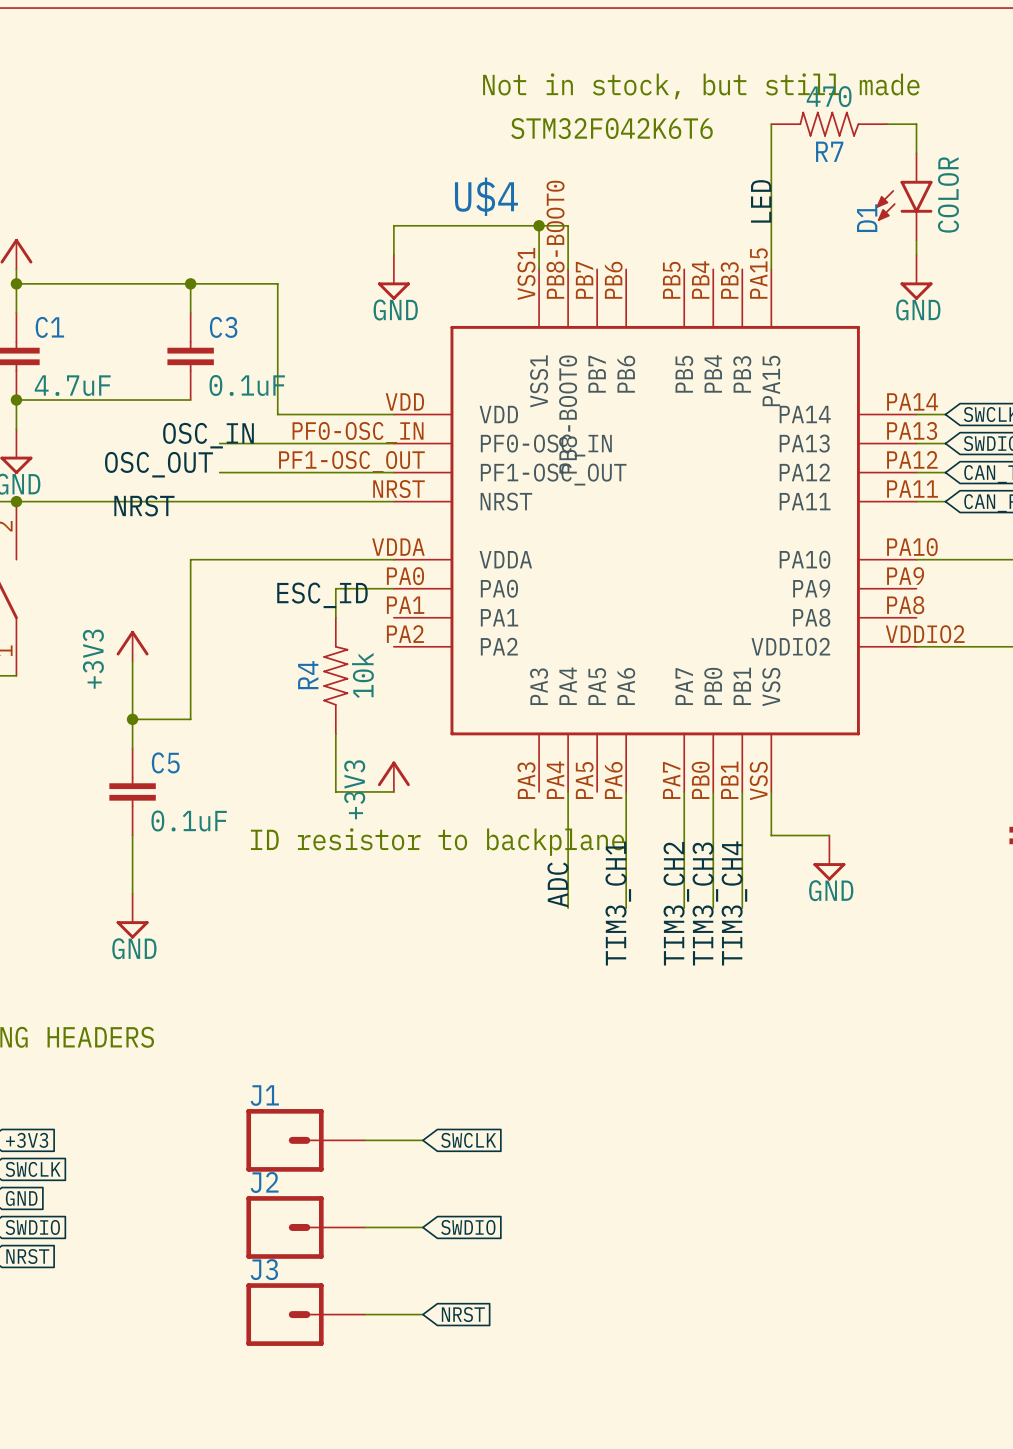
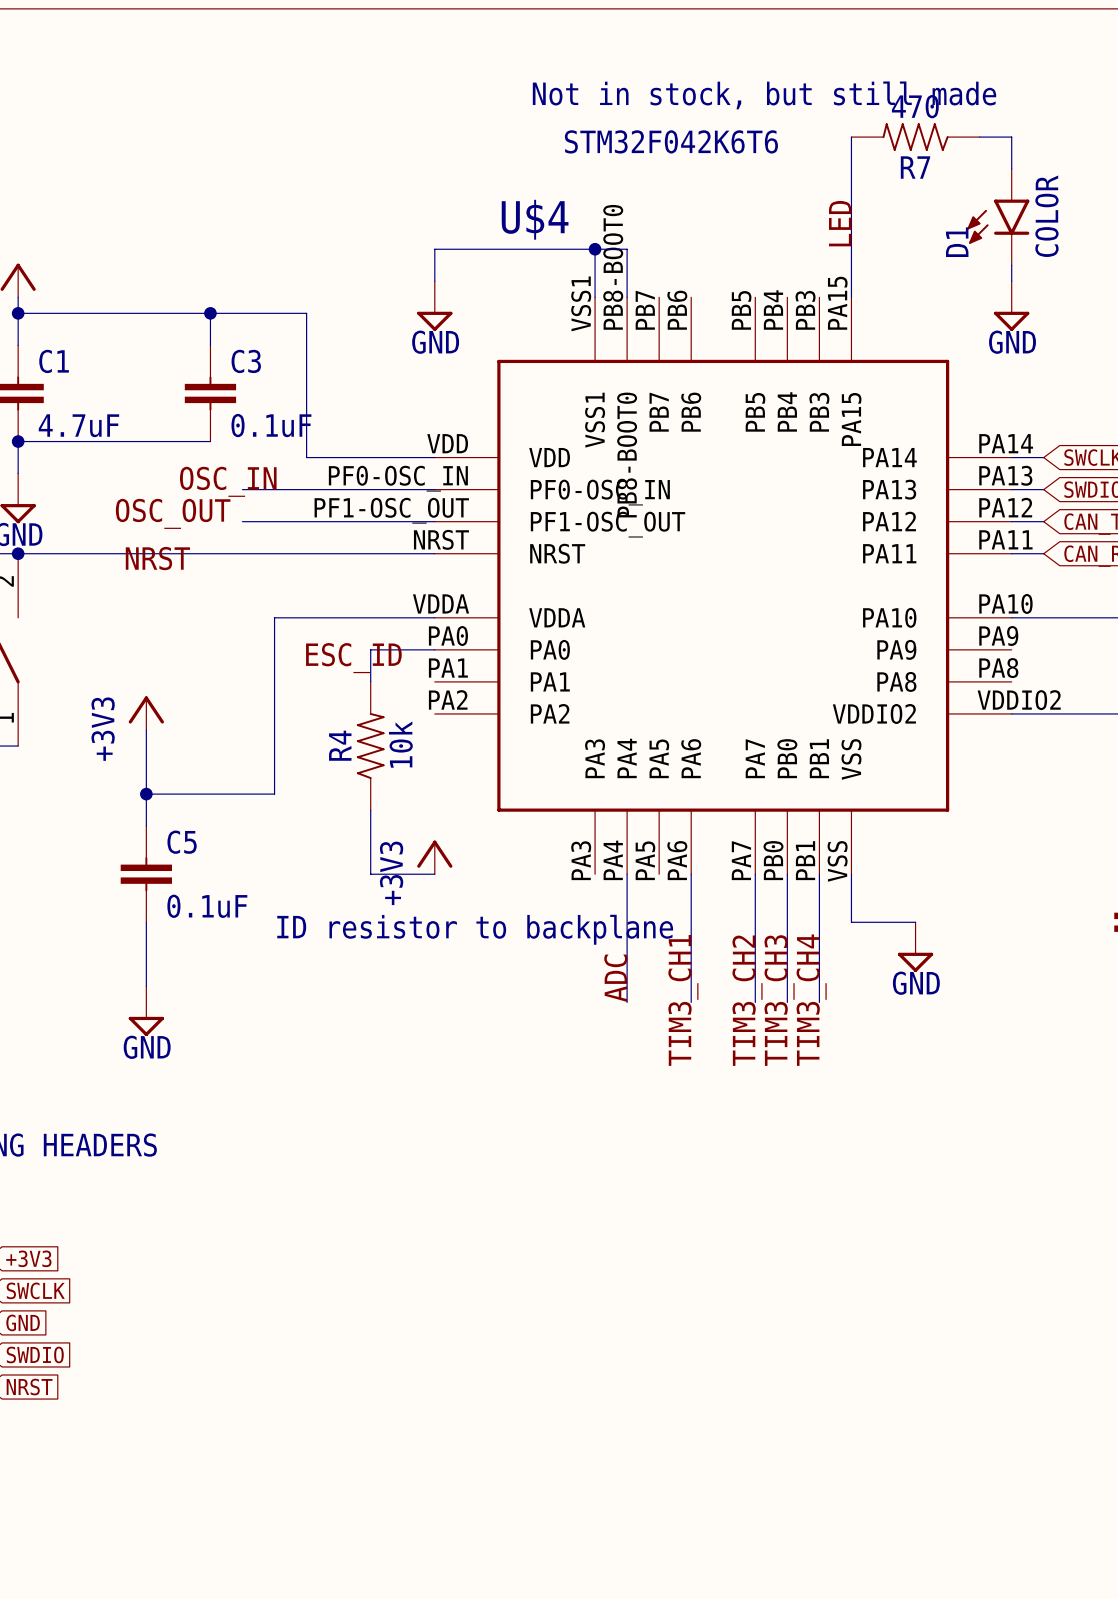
wire: (248, 559) (190, 559) (190, 719) -> (274, 617) (274, 794) (210, 794)
J1: (305, 1140) -> none
wire: (364, 1140) (422, 1140) -> none
global label: SWCLK (468, 1140) -> none
J2: (305, 1227) -> none
wire: (364, 1227) (422, 1227) -> none
global label: SWDIO (468, 1227) -> none
J3: (305, 1314) -> none
wire: (364, 1314) (422, 1314) -> none
global label: NRST (463, 1314) -> none

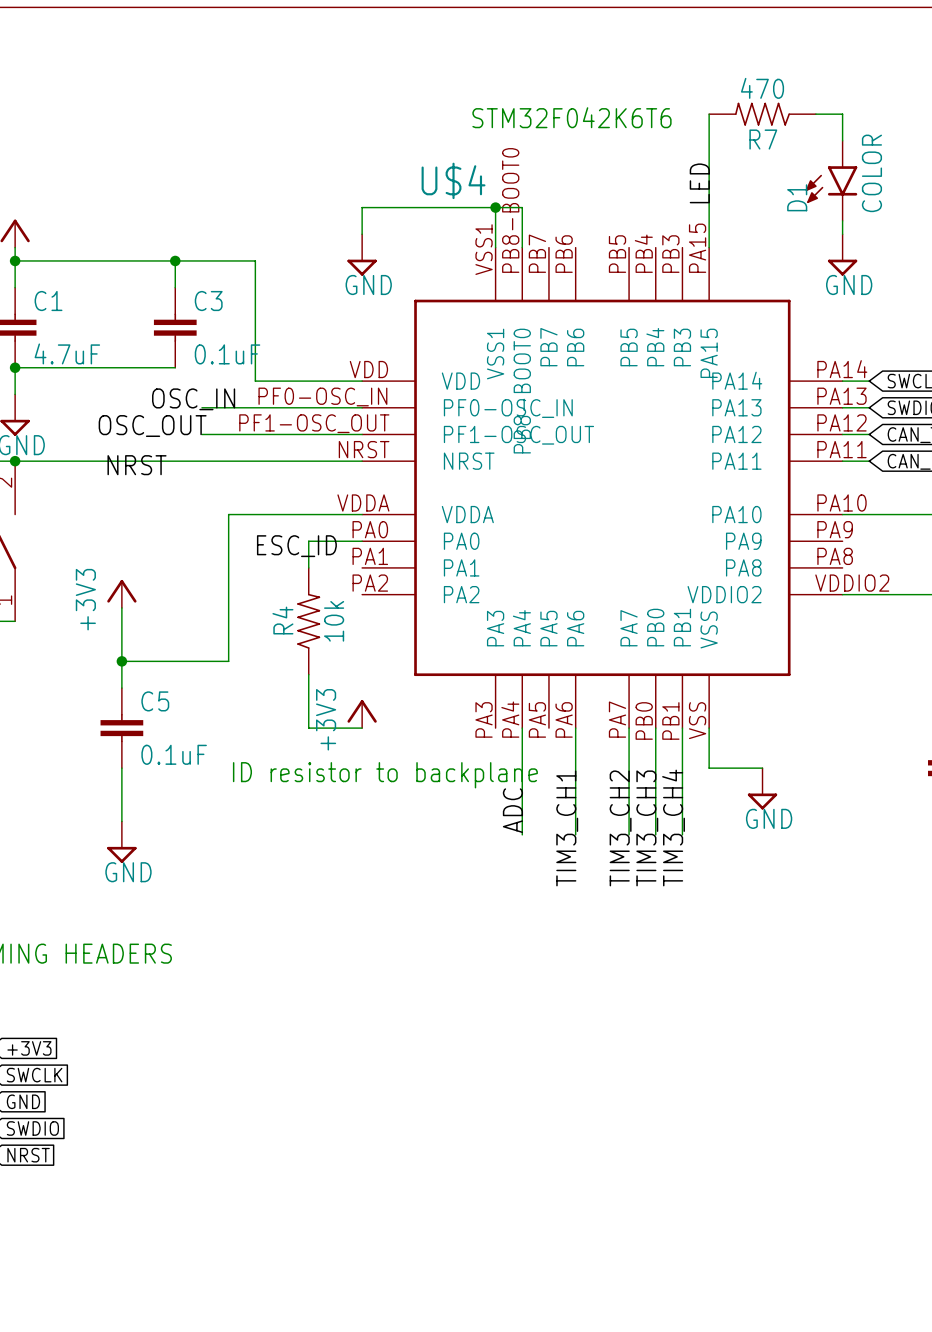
text: Not in stock, but still made (764, 95) -> none

